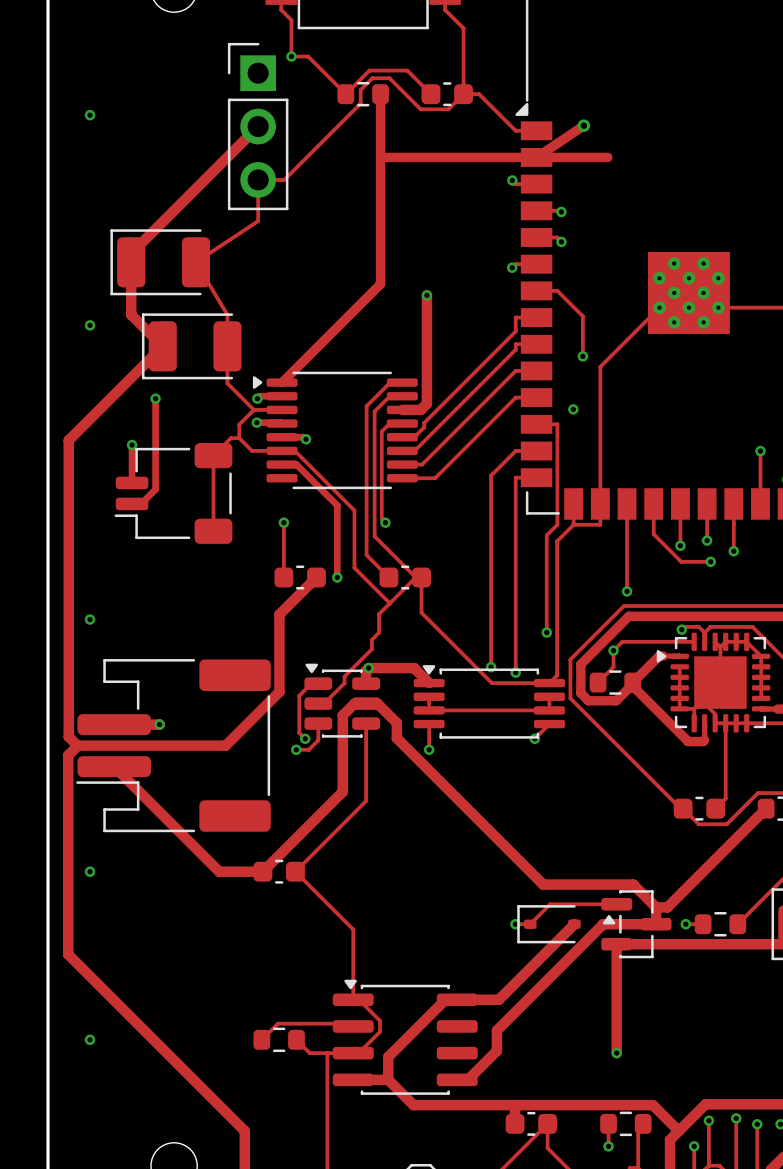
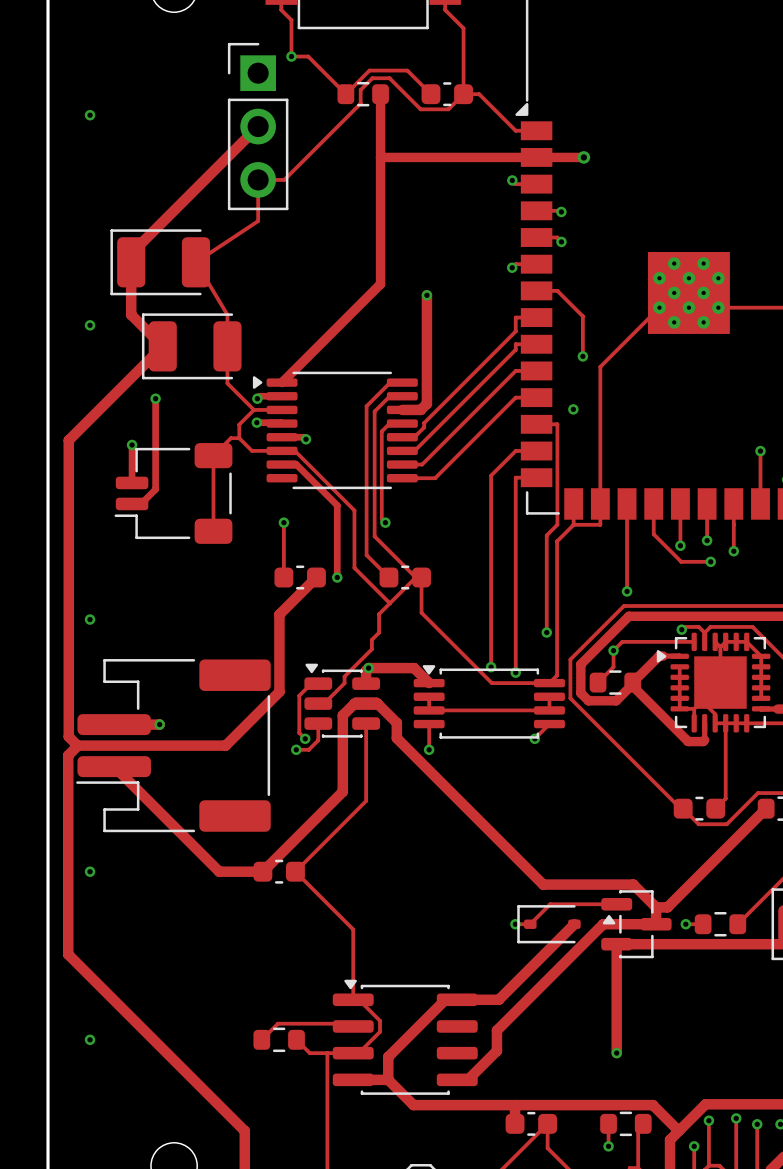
track: (583, 125) (536, 157) -> none
via position: (583, 125) -> (583, 157)
track: (583, 157) (607, 157) -> none

